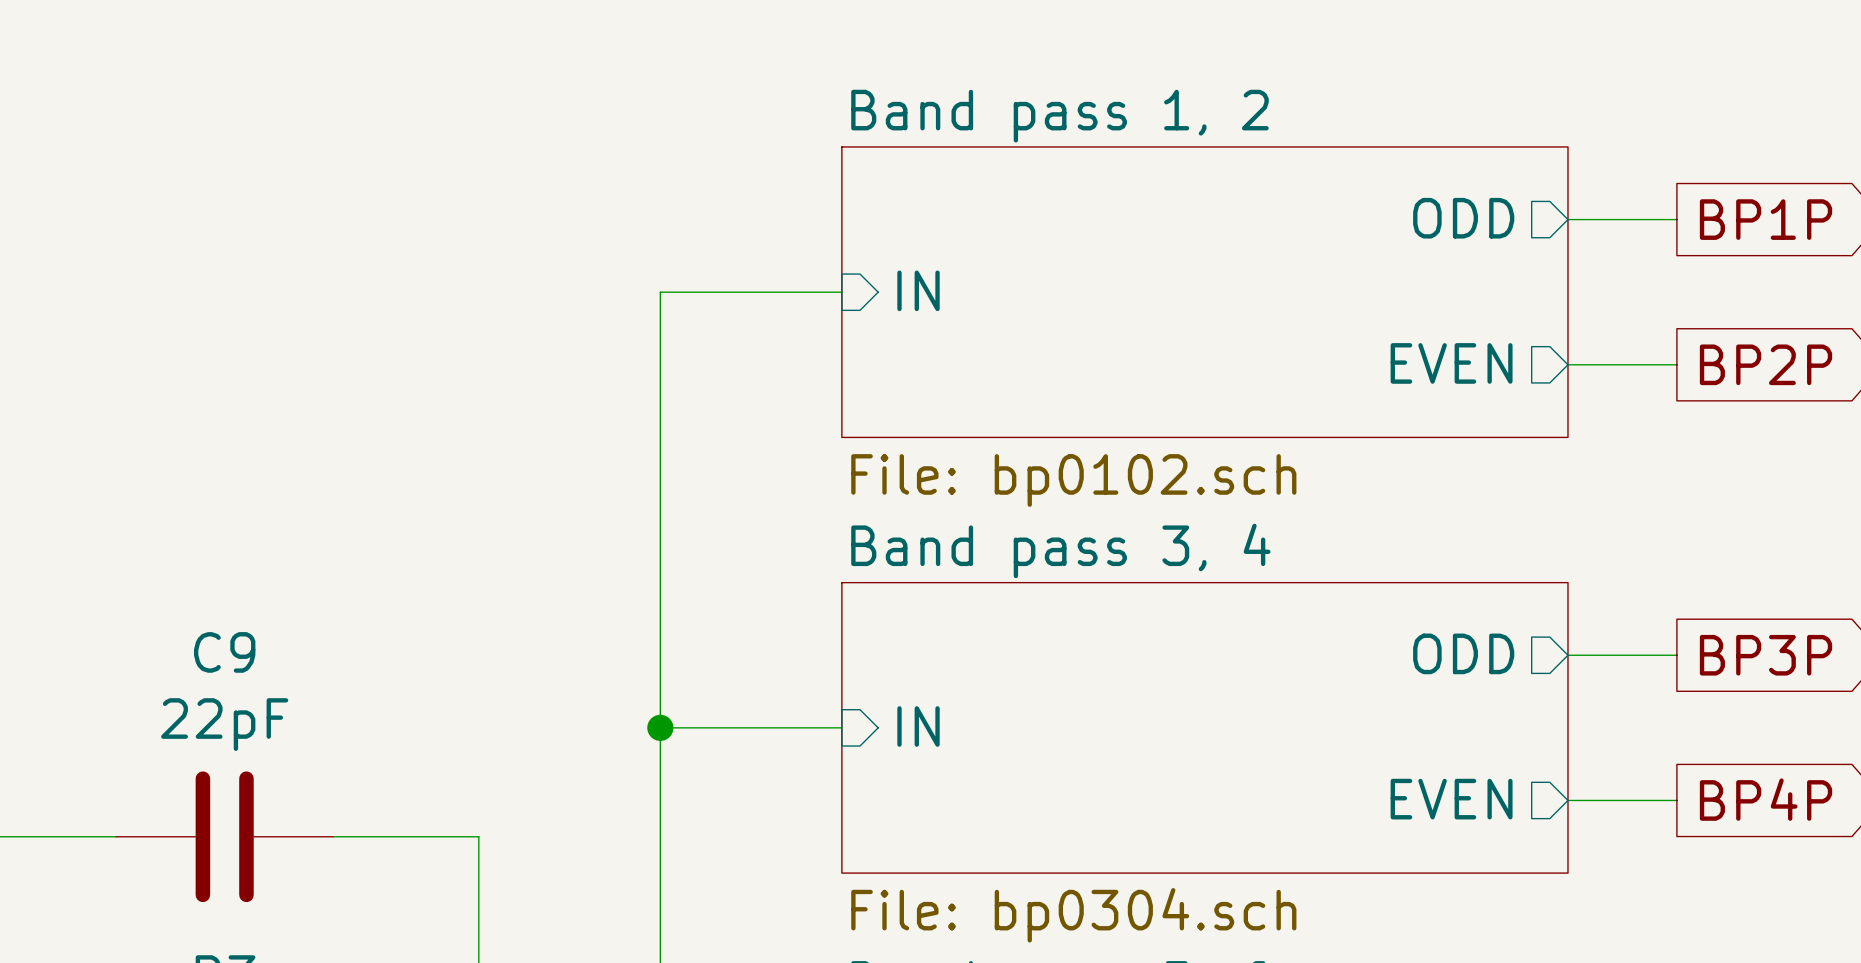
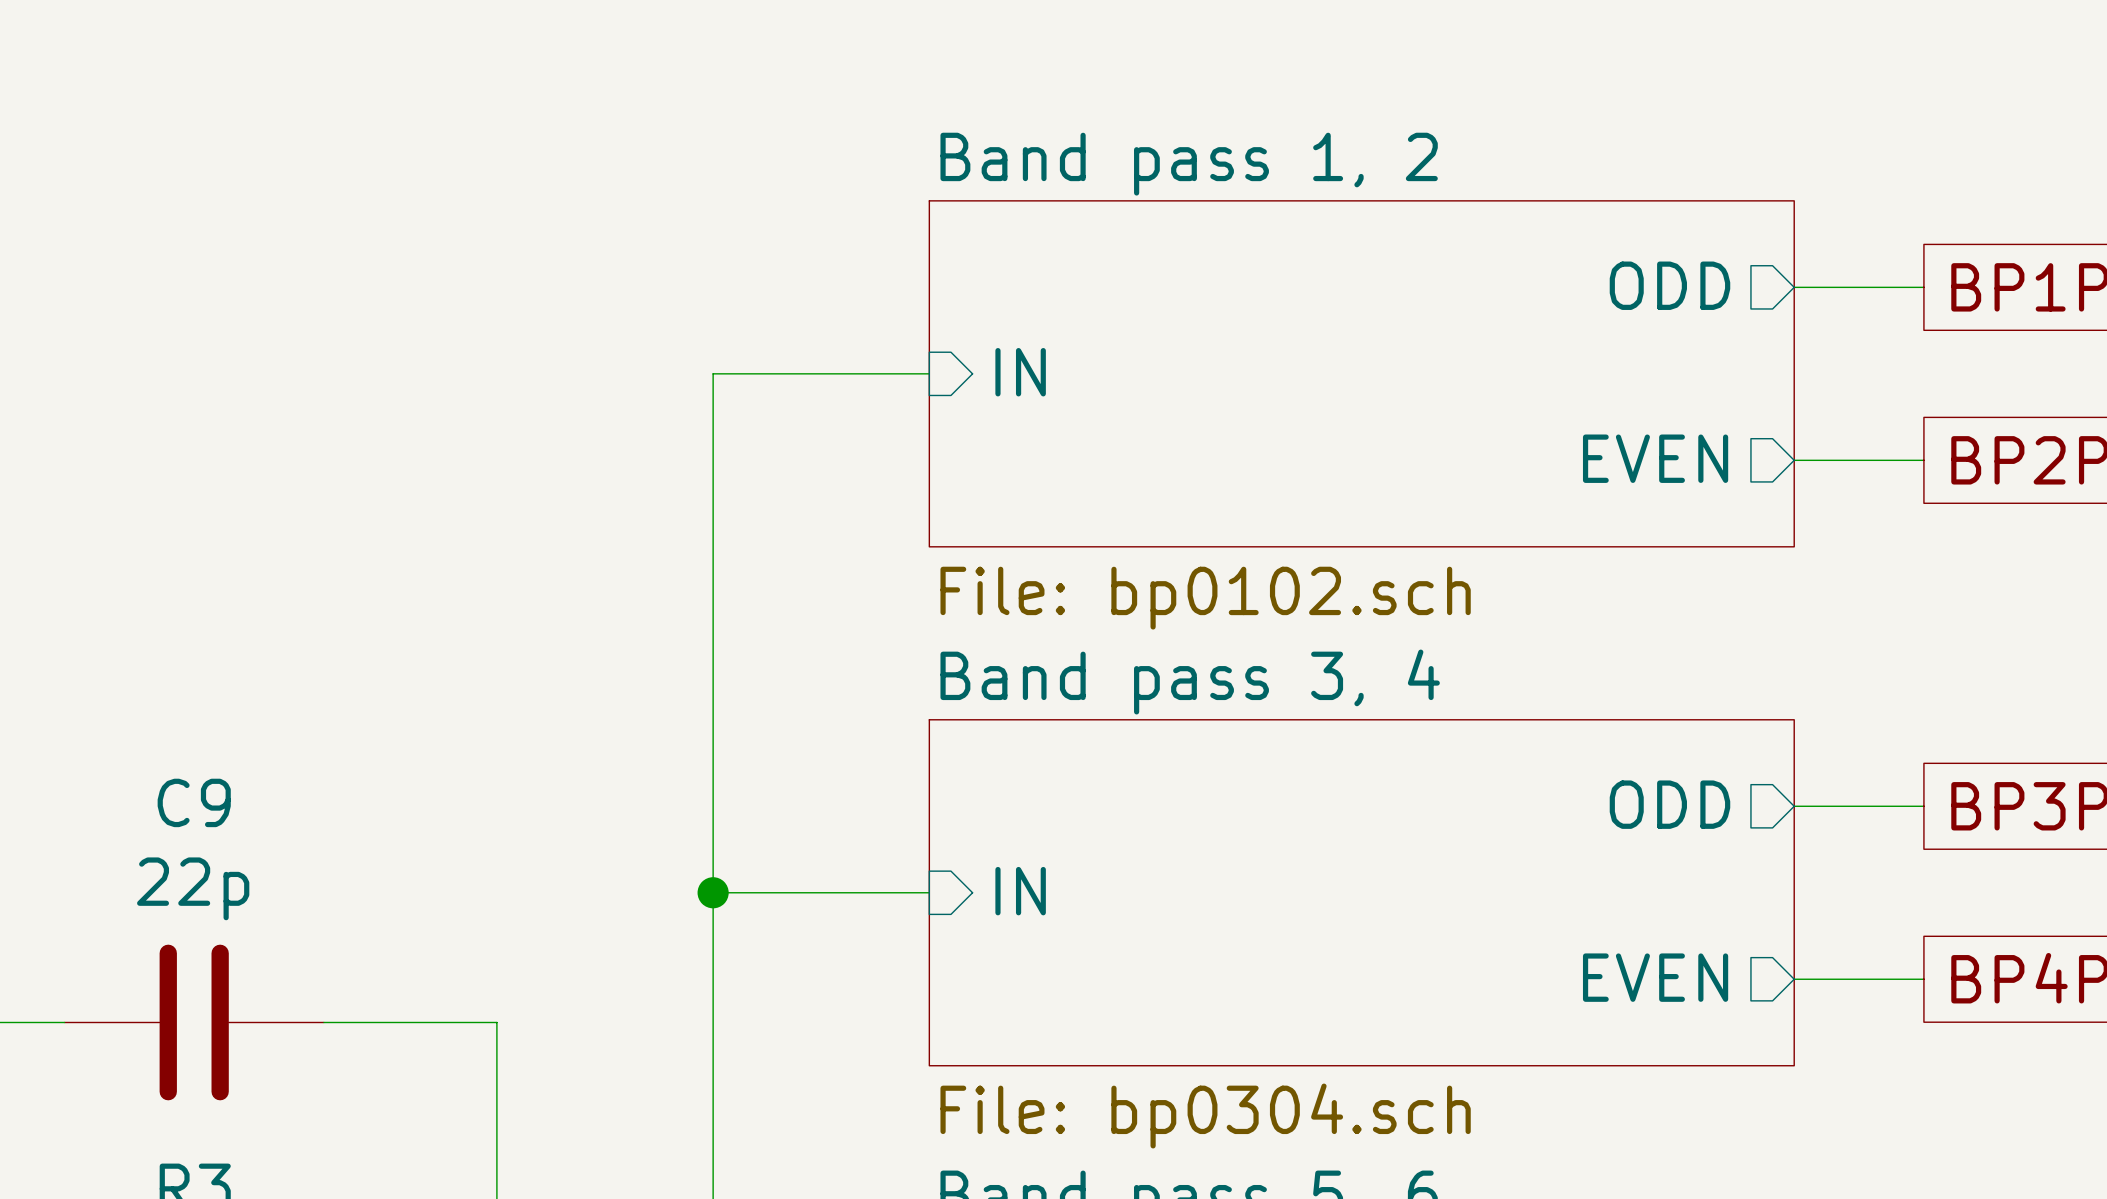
C9 value: 22pF (224, 724) -> 22p (193, 888)

